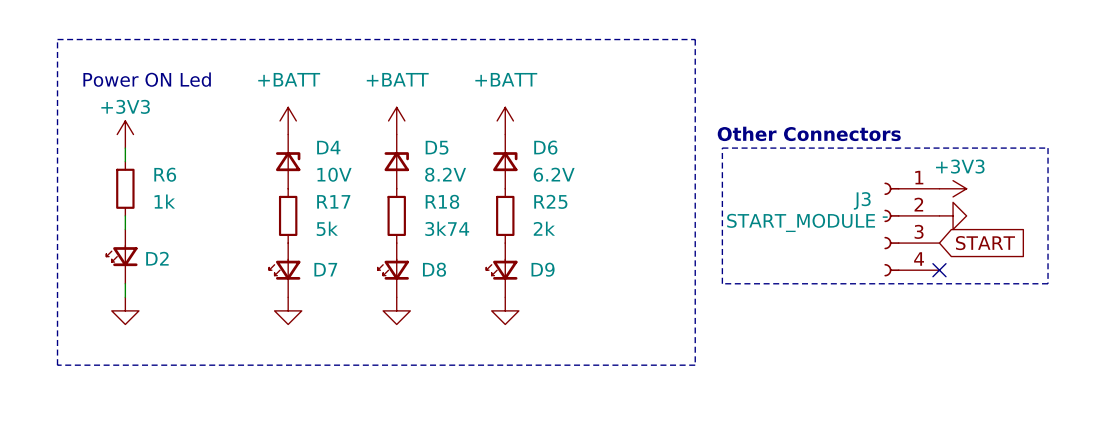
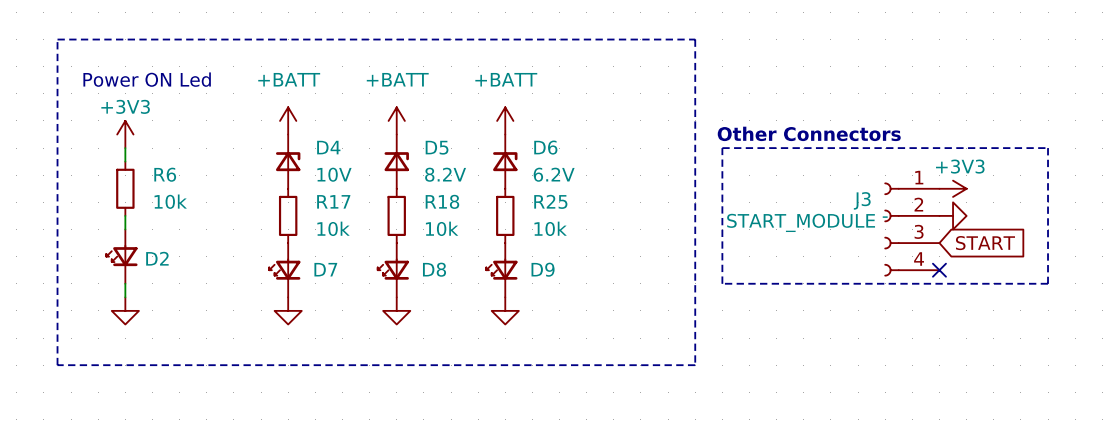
R6 value: 1k (164, 201) -> 10k (170, 201)
R17 value: 5k (327, 228) -> 10k (333, 228)
R18 value: 3k74 (447, 228) -> 10k (442, 228)
R25 value: 2k (544, 228) -> 10k (550, 228)

